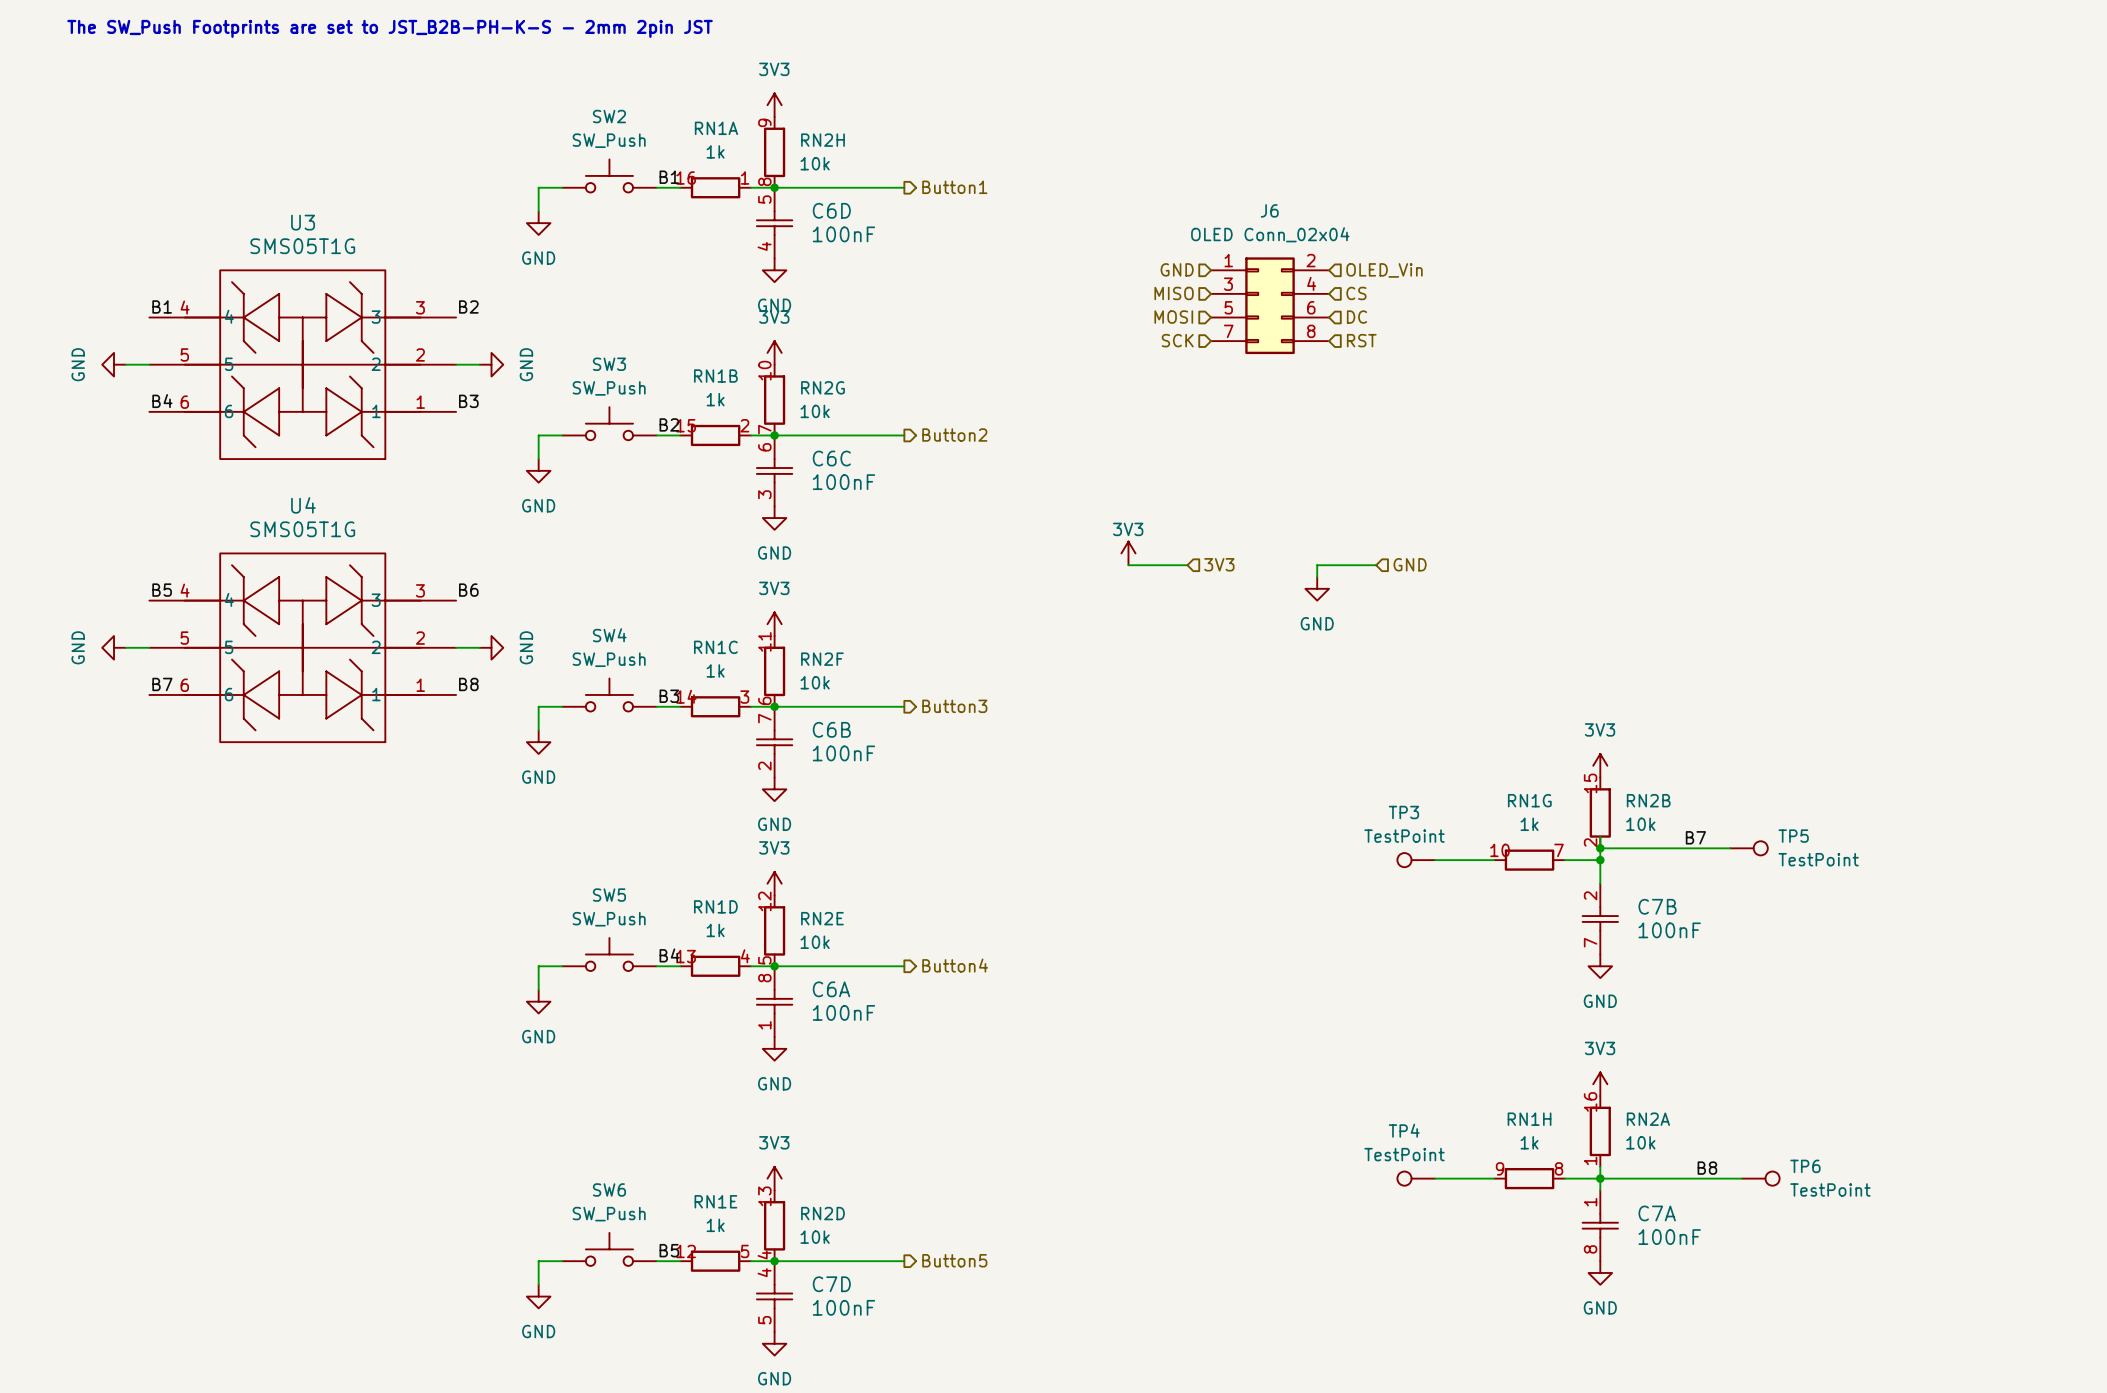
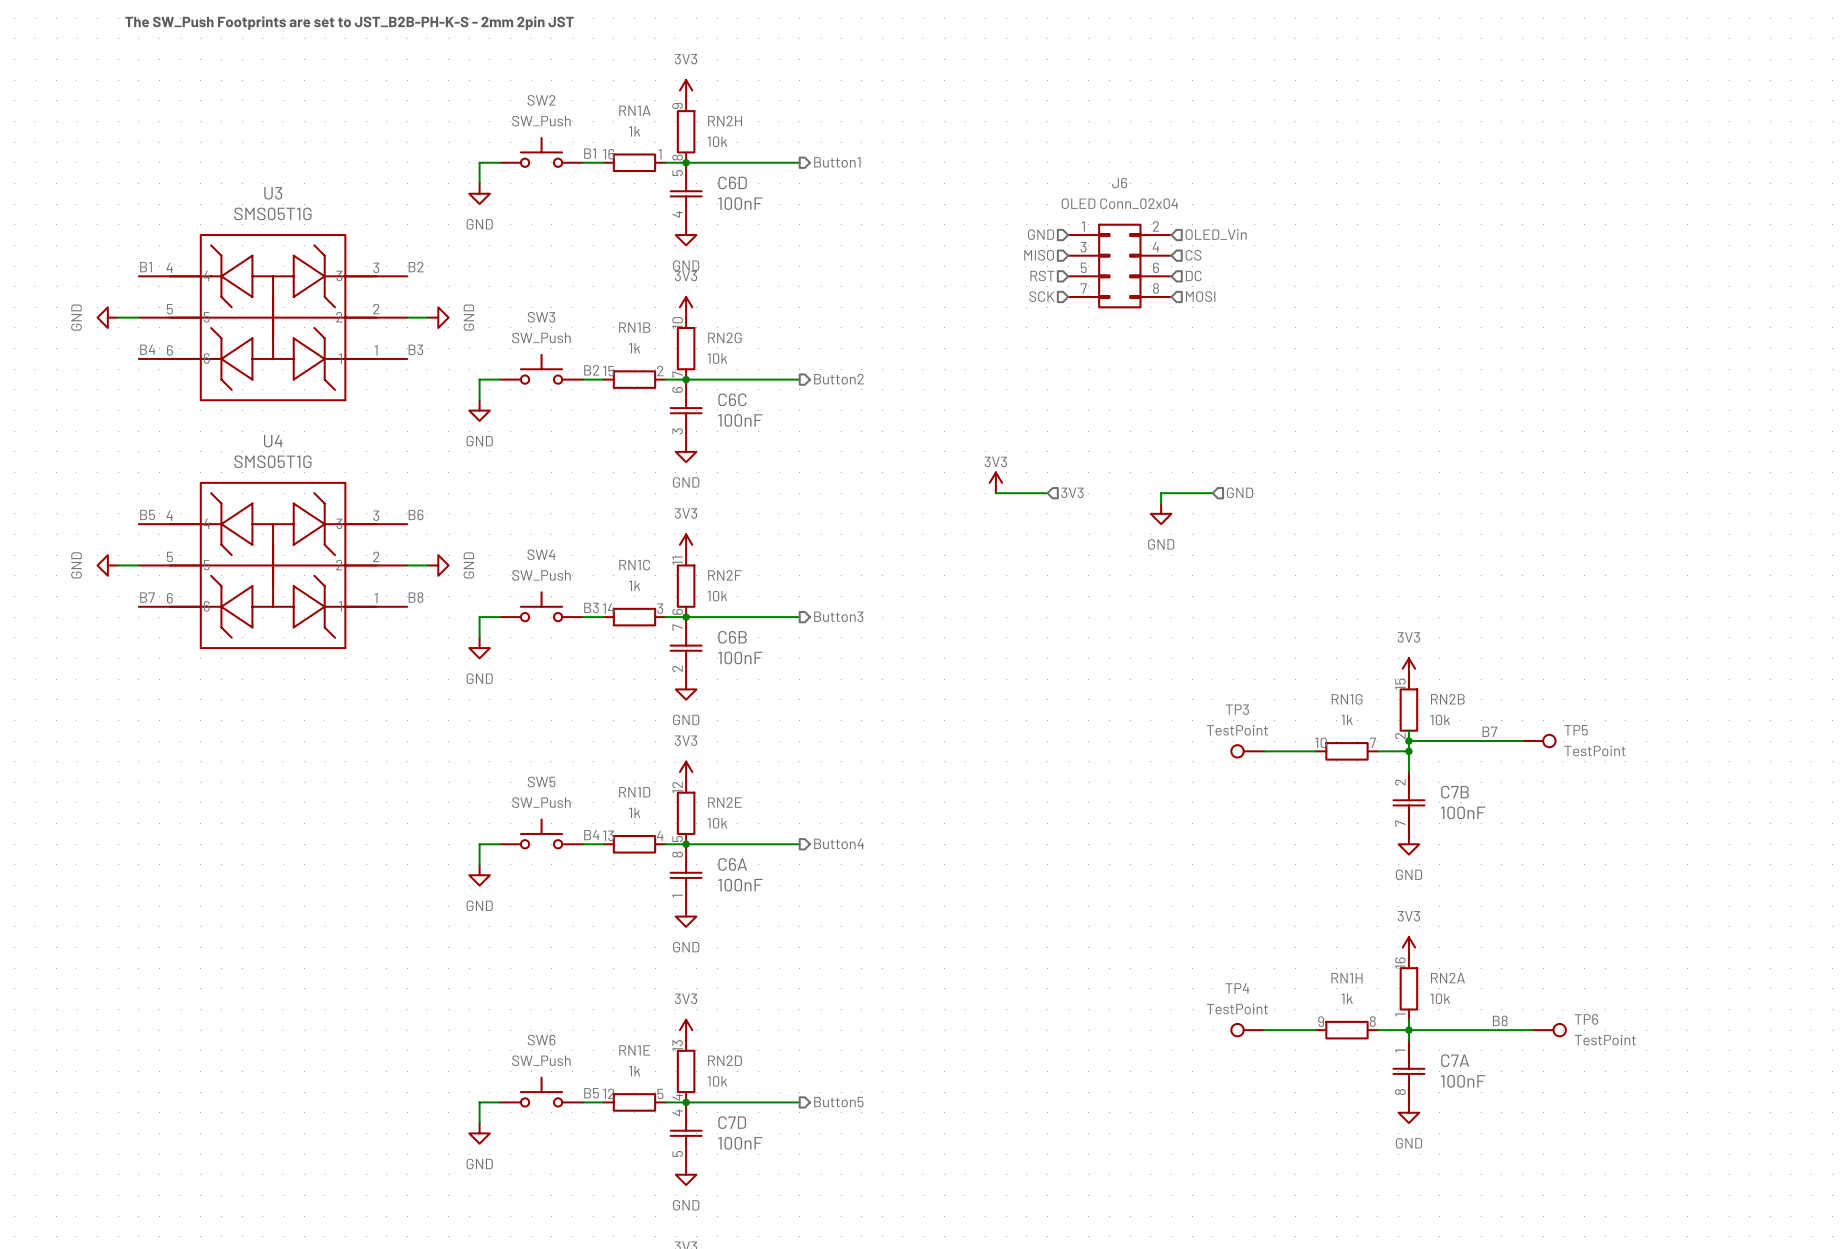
hierarchical label: MOSI (1173, 317) -> RST (1042, 275)
hierarchical label: RST (1361, 340) -> MOSI (1200, 296)

